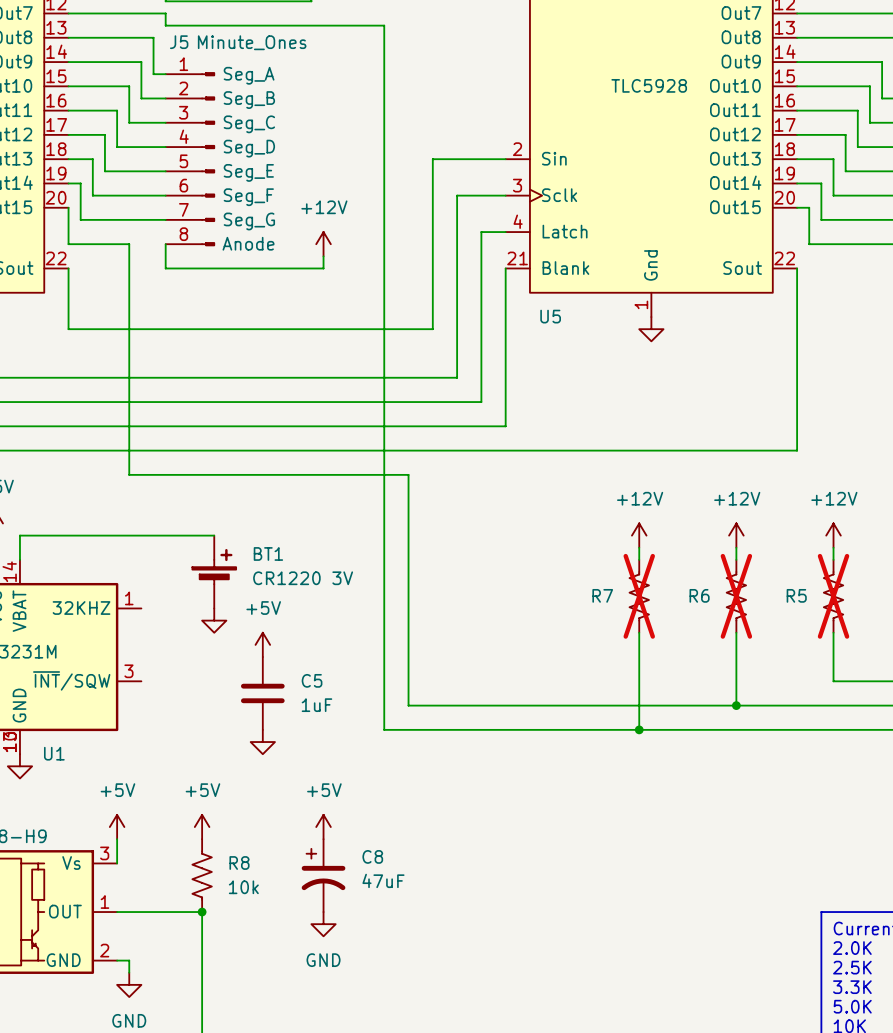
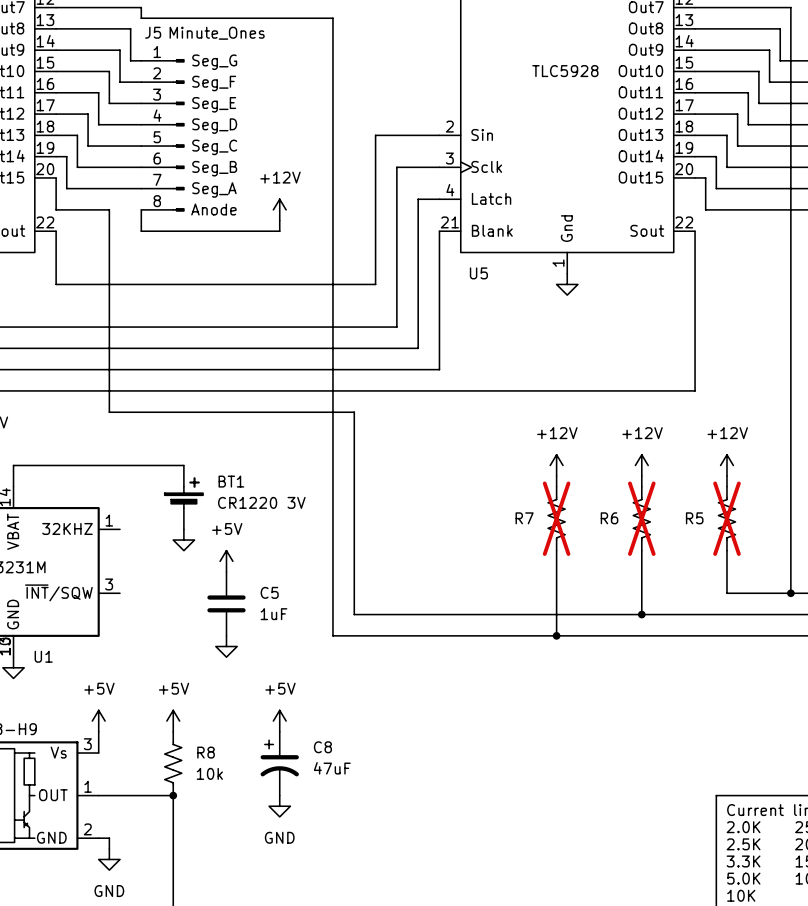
J5 pin name: Seg_A (249, 75) -> Seg_G (214, 62)
J5 pin name: Seg_B (249, 100) -> Seg_F (214, 83)
J5 pin name: Seg_C (249, 124) -> Seg_E (214, 104)
J5 pin name: Seg_E (248, 172) -> Seg_C (214, 147)
J5 pin name: Seg_F (248, 197) -> Seg_B (214, 168)
J5 pin name: Seg_G (249, 221) -> Seg_A (214, 189)

